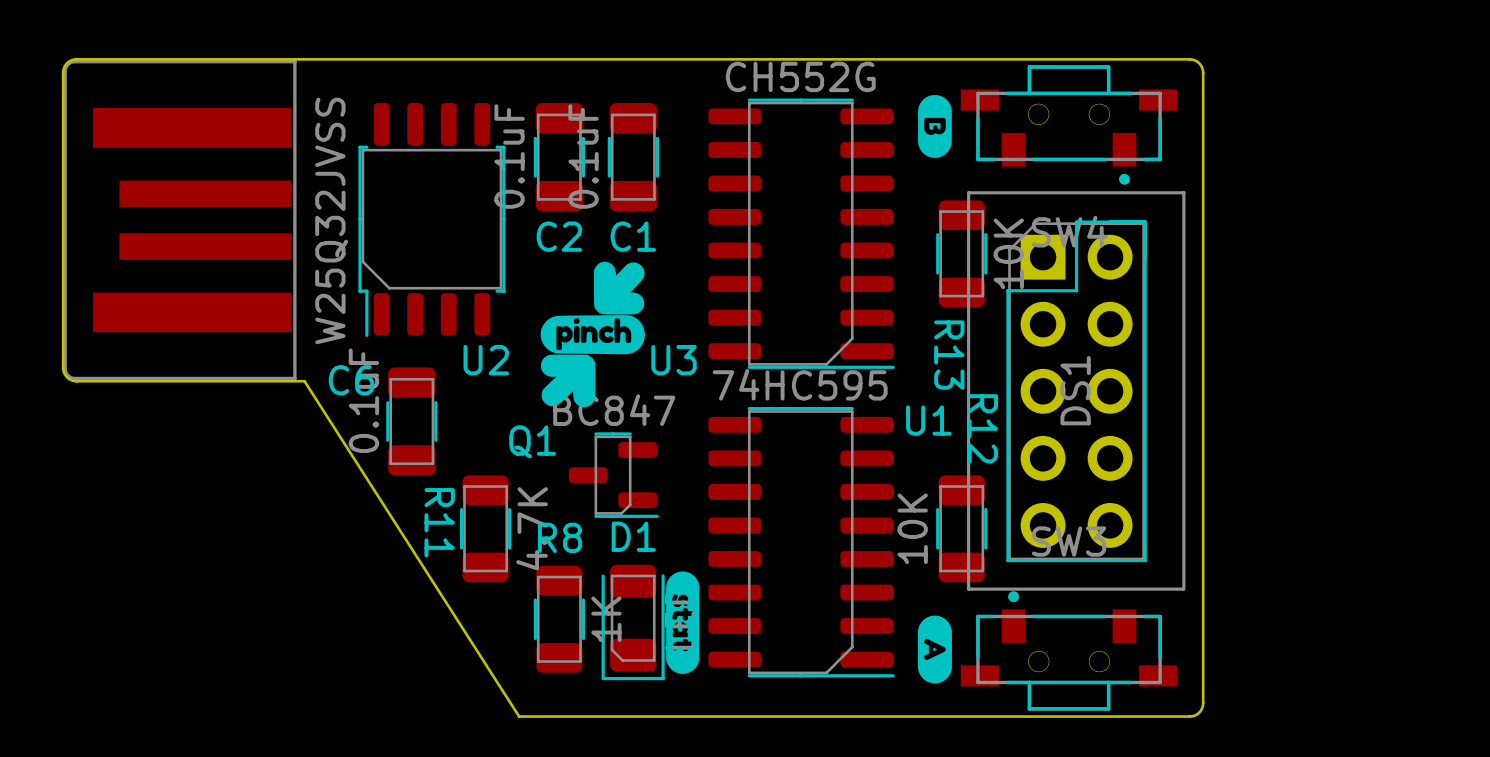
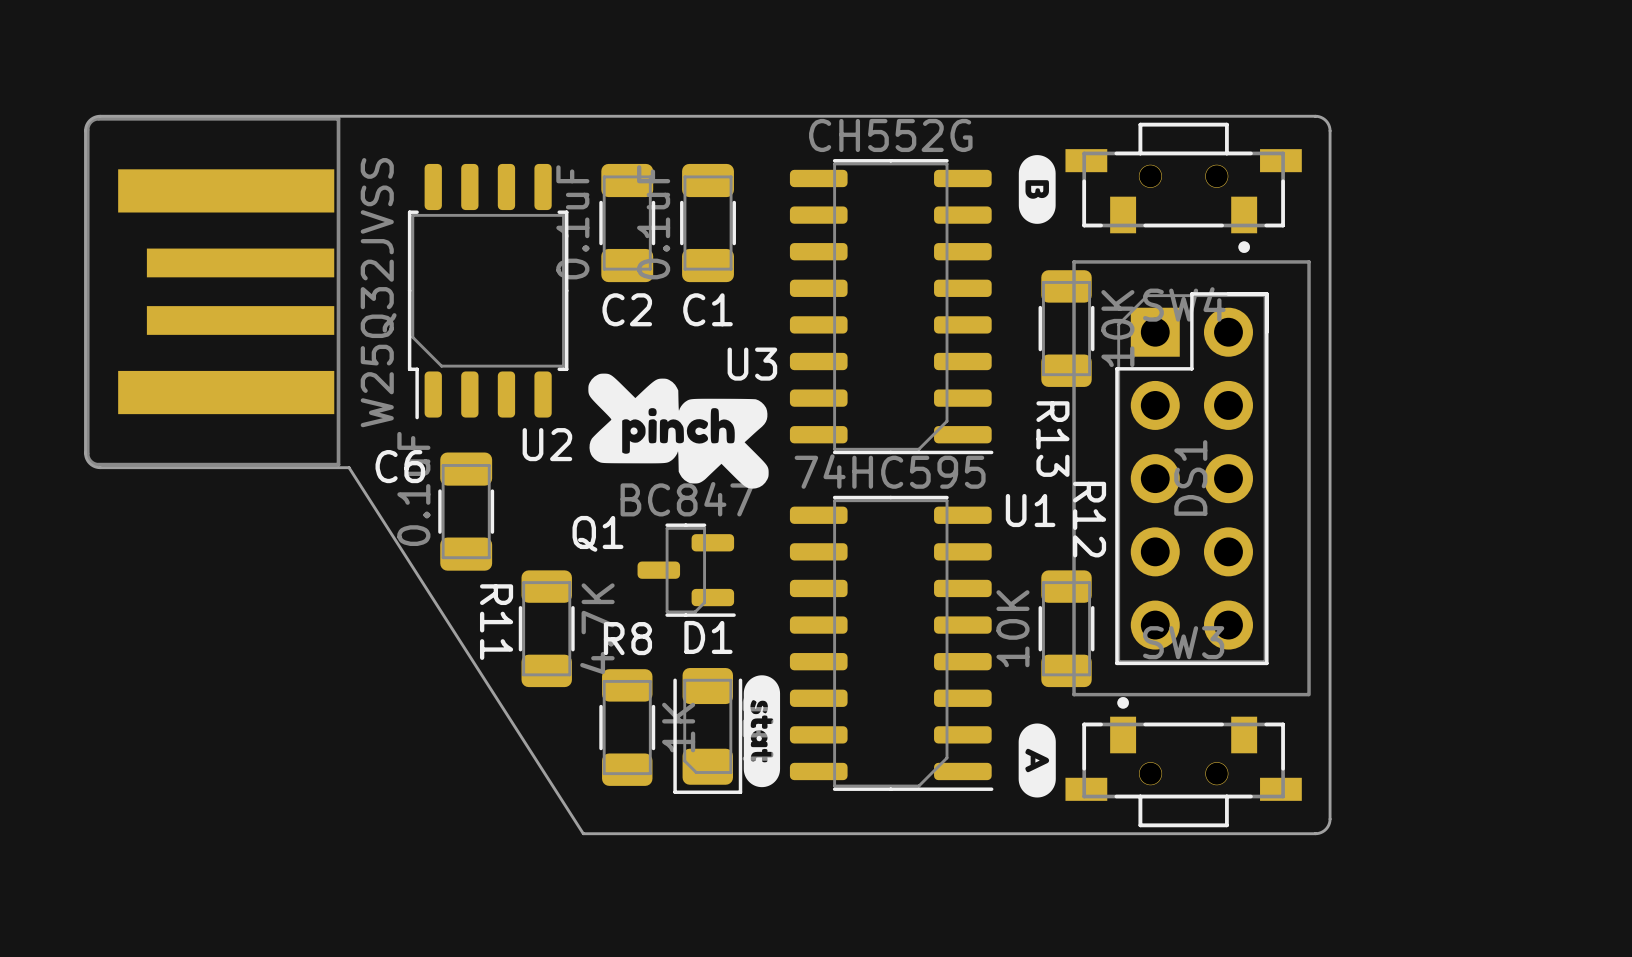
drawing shape: [540, 261, 645, 408] -> [588, 373, 769, 489]
U3 name position: U3 (674, 360) -> U3 (752, 364)

